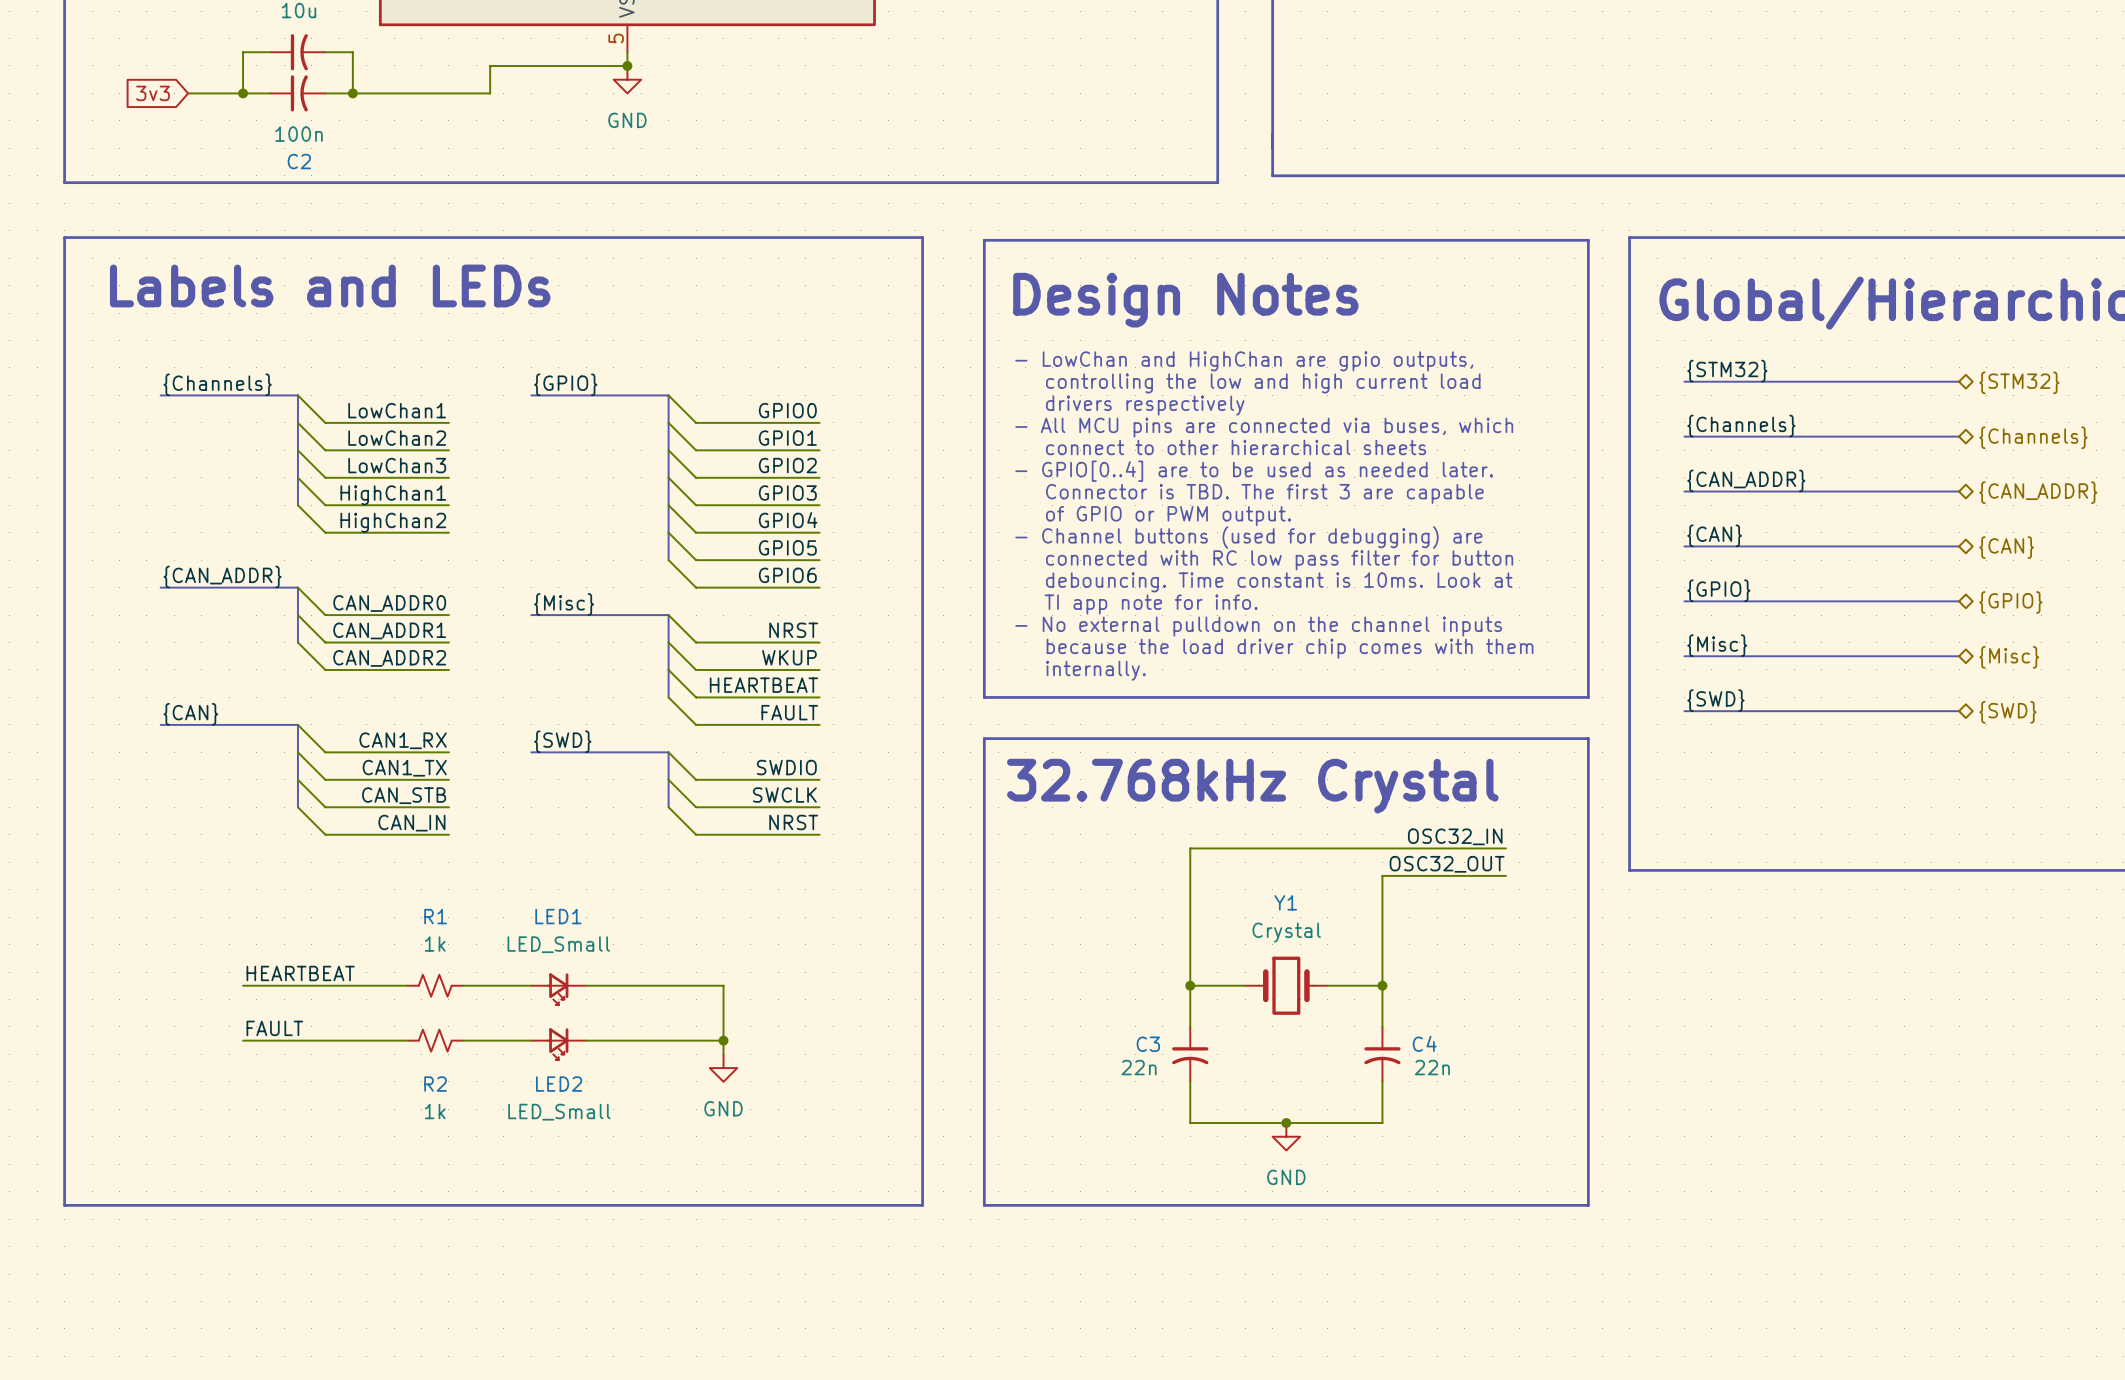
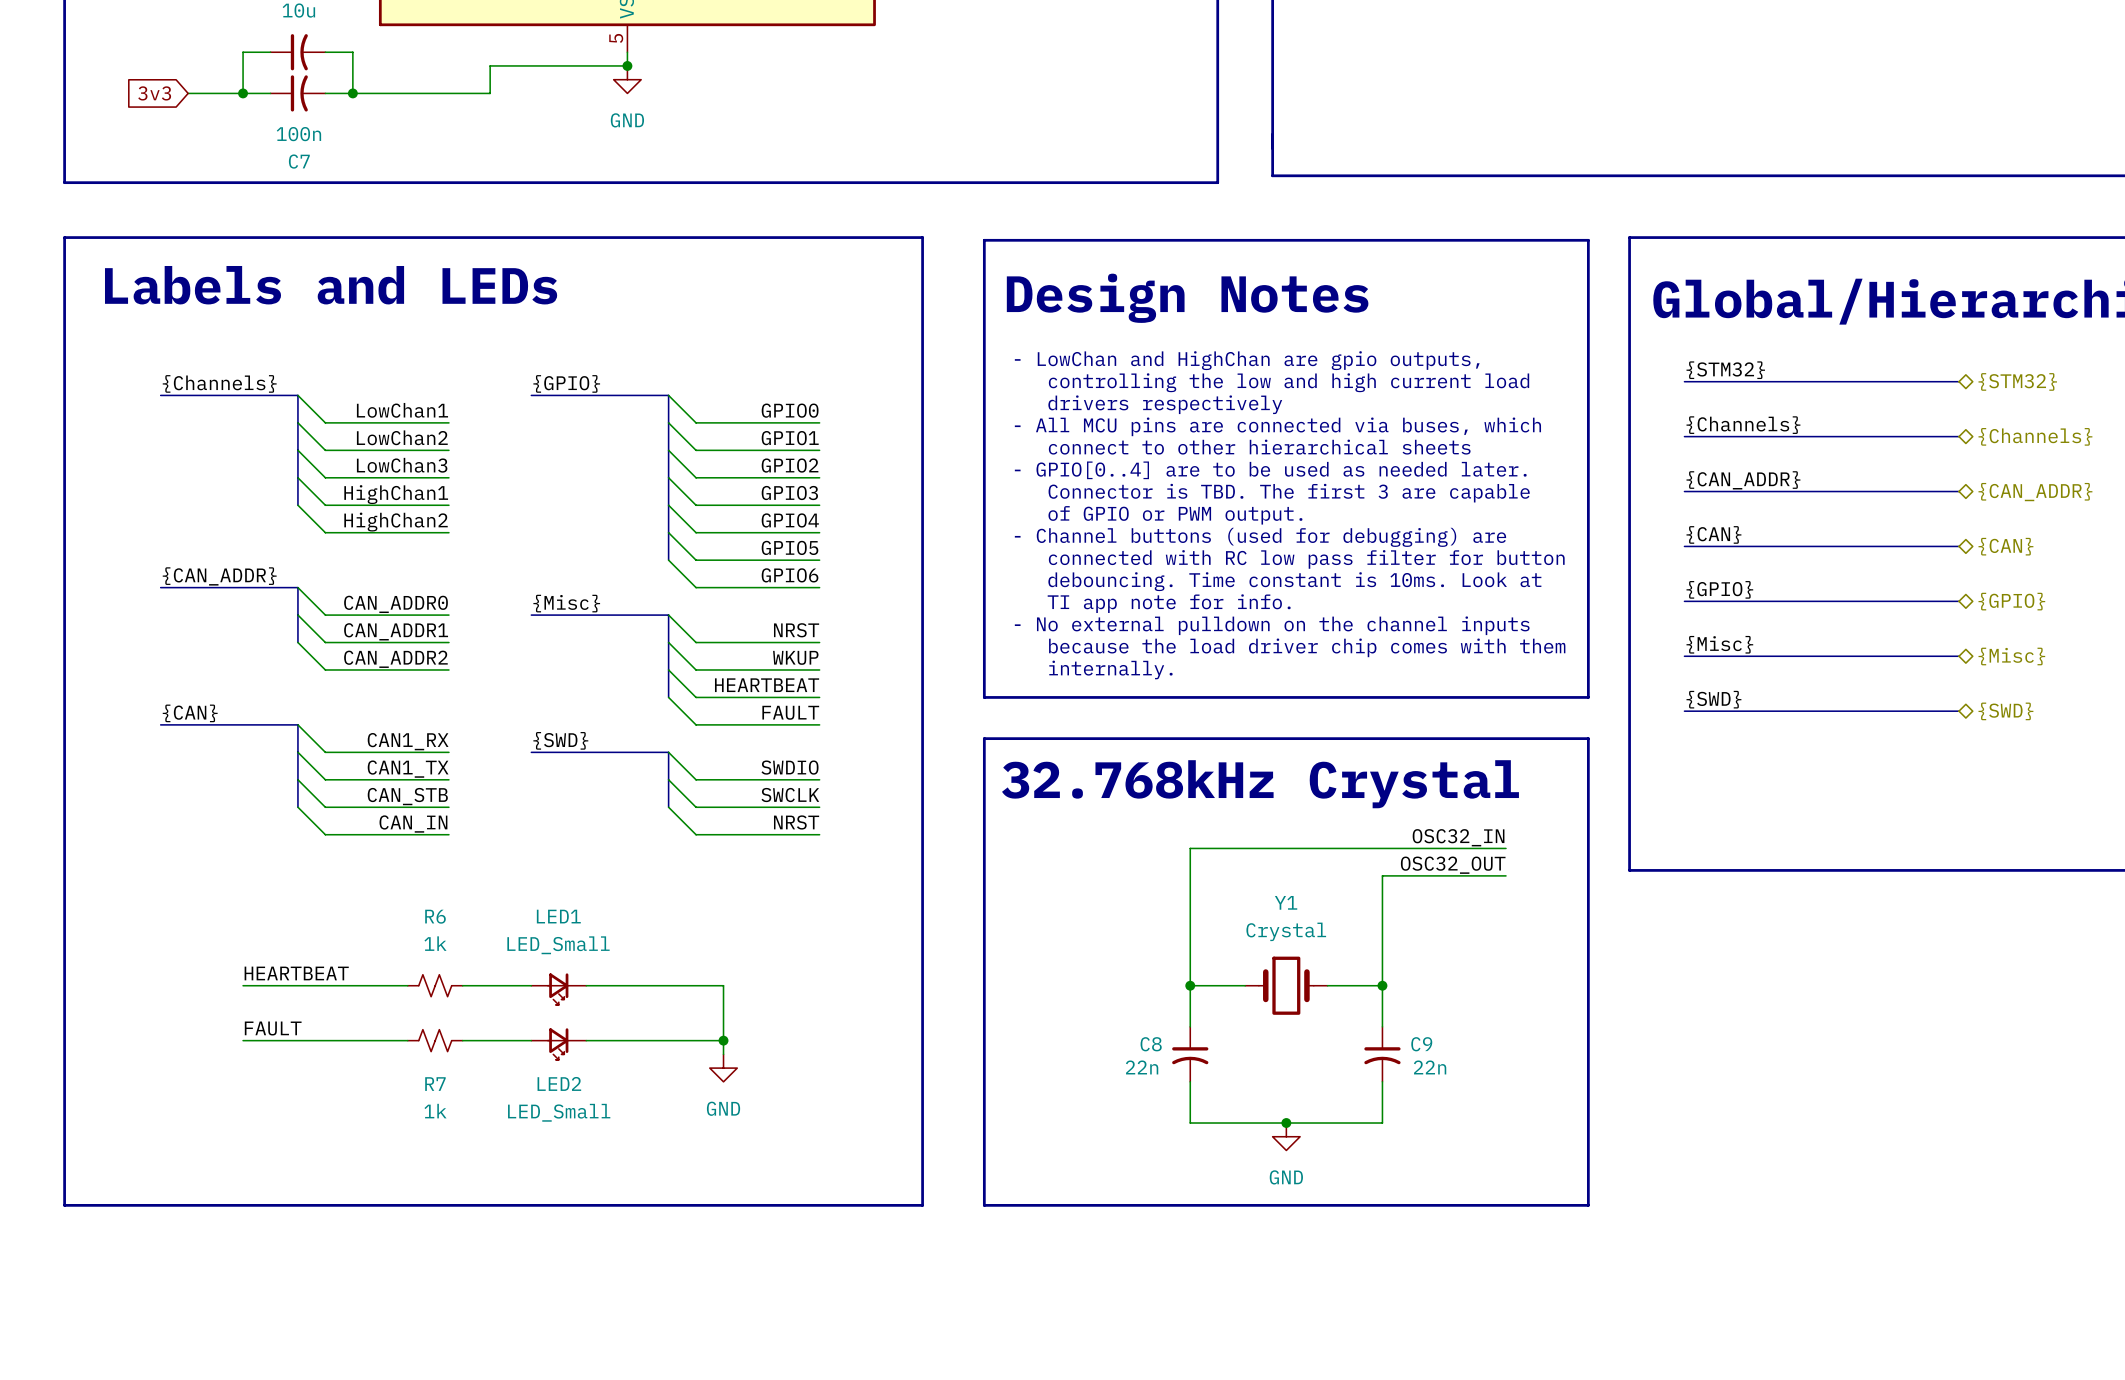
C2 name: C2 (299, 161) -> C7 (299, 161)
R1 name: R1 (435, 916) -> R6 (435, 916)
C4 name: C4 (1424, 1043) -> C9 (1421, 1044)
C3 name: C3 (1148, 1044) -> C8 (1151, 1044)
R2 name: R2 (435, 1084) -> R7 (435, 1084)

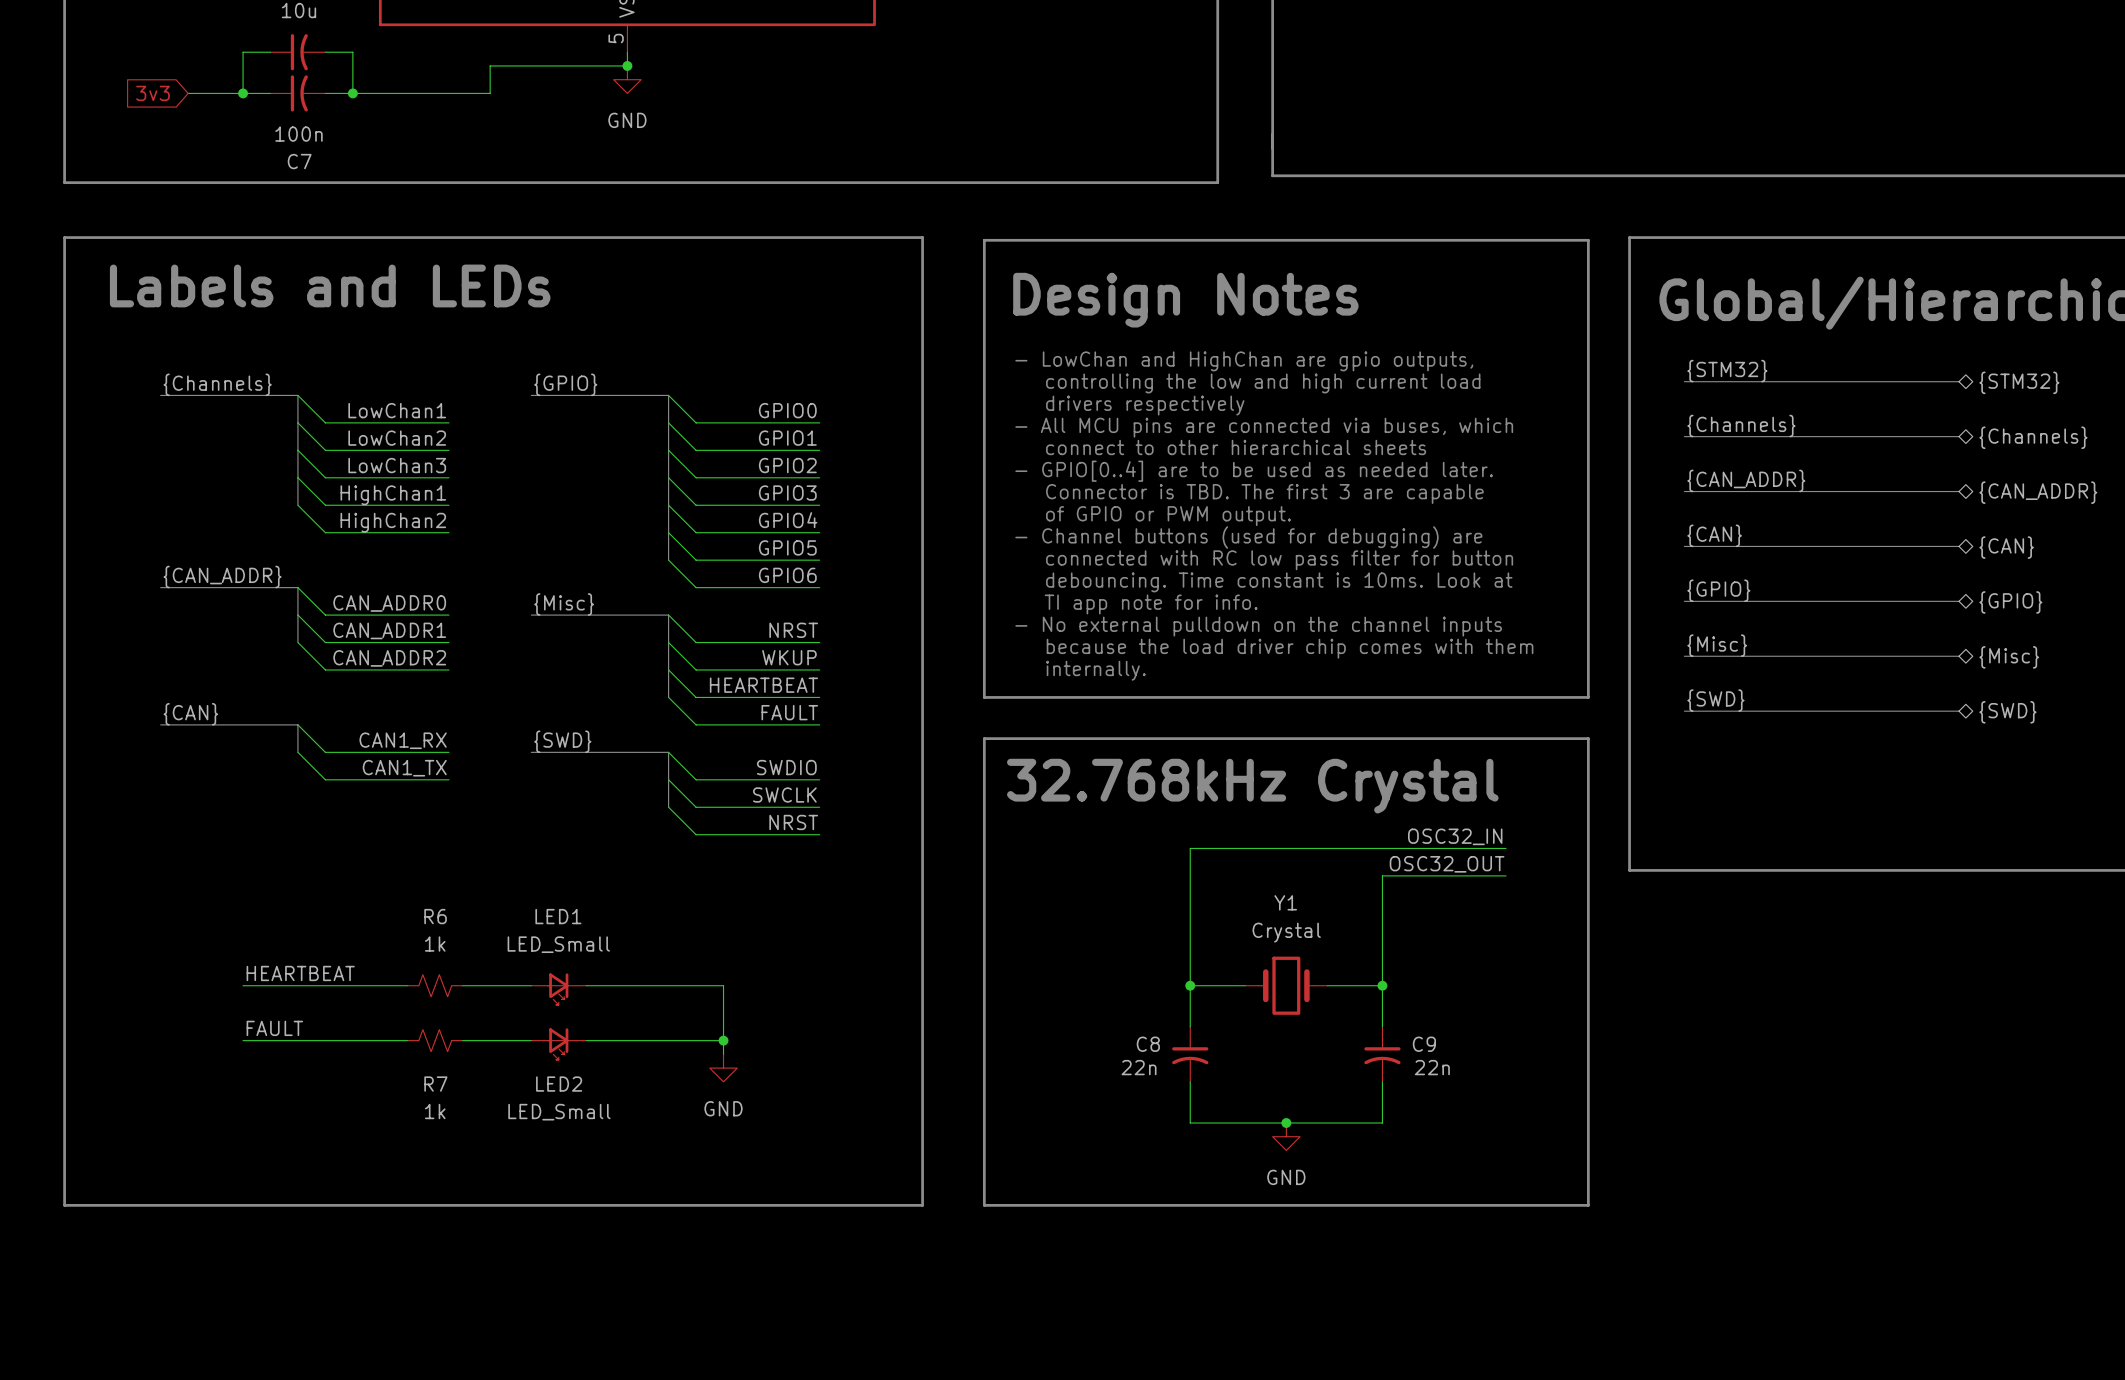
bus: (297, 752) (297, 807) -> none
wire: (297, 779) (325, 807) (448, 807) -> none
label: CAN_STB (407, 796) -> none
wire: (297, 807) (325, 834) (448, 834) -> none
label: CAN_IN (413, 824) -> none

